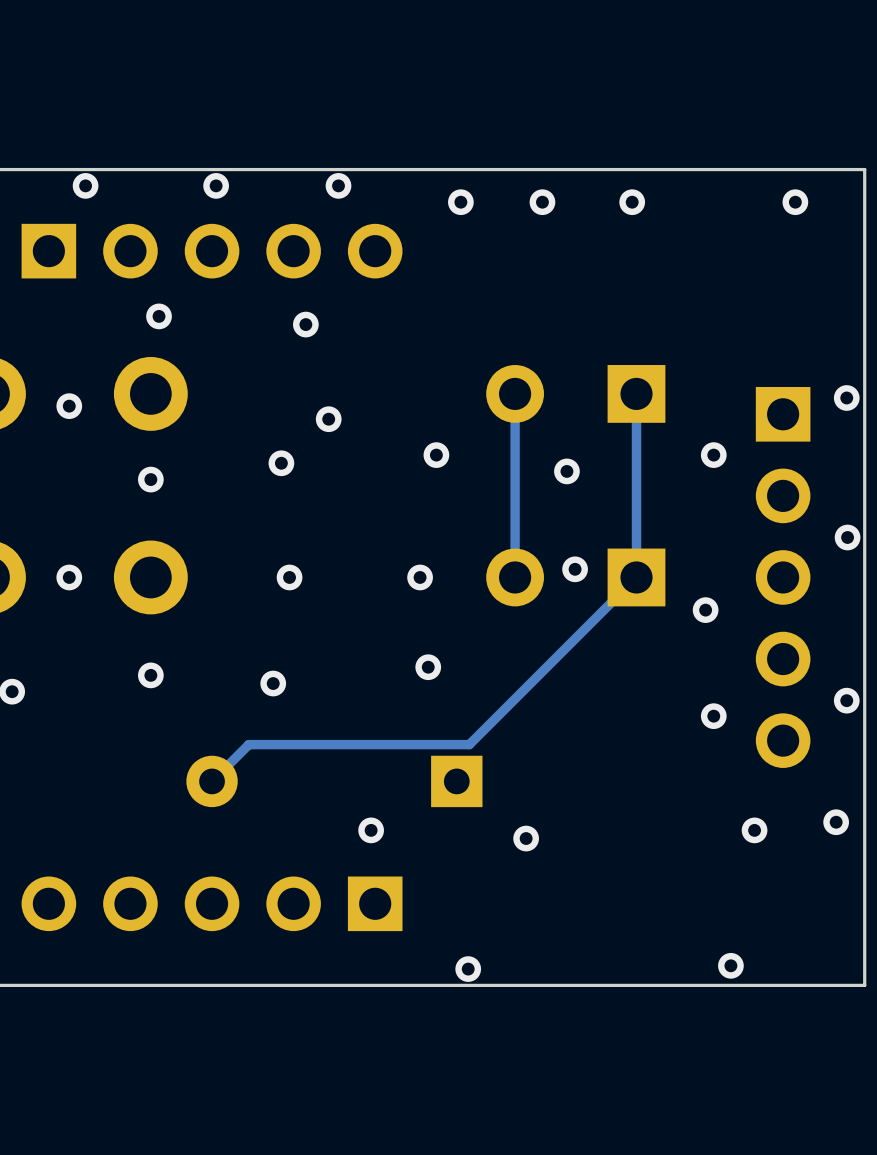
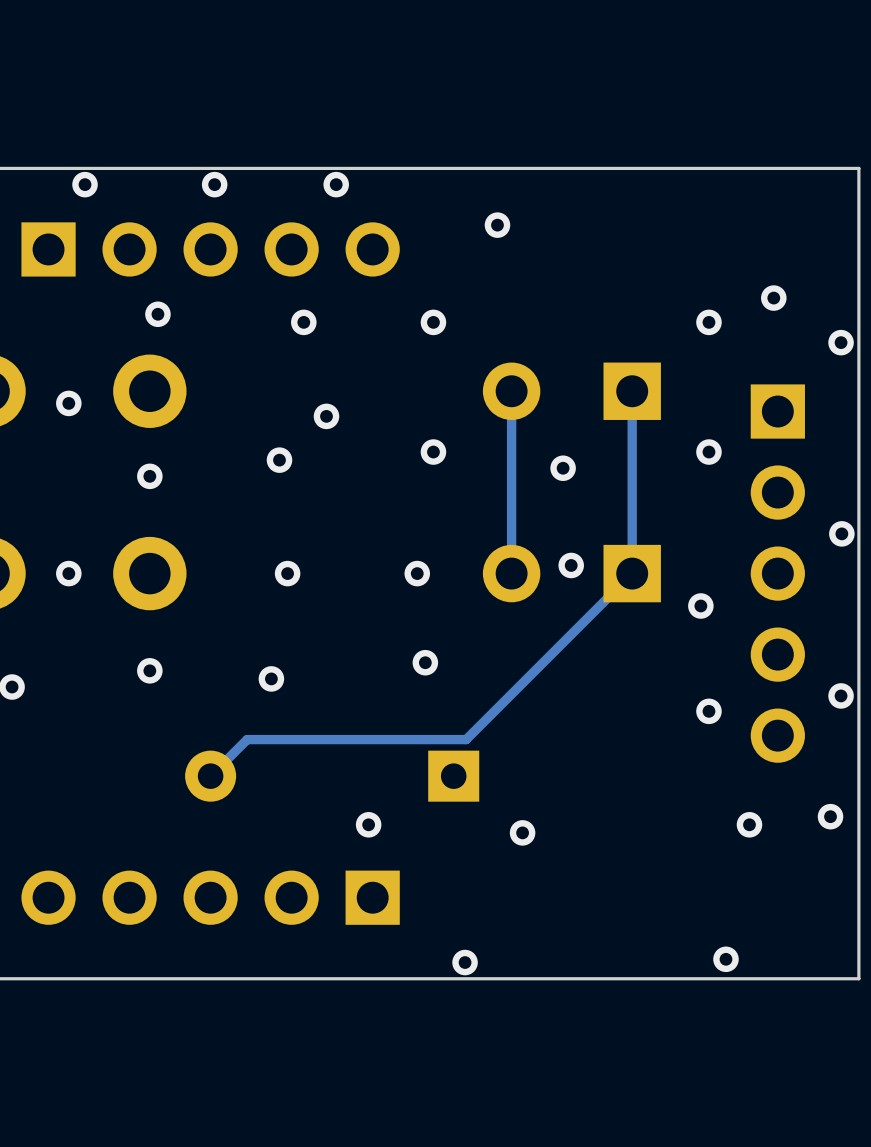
via: (460, 202) -> none
via: (542, 202) -> none
via: (632, 202) -> none
via: (795, 202) -> none
via: none -> (497, 225)
via: none -> (773, 298)
via: none -> (433, 322)
via: none -> (708, 322)
via position: (846, 397) -> (841, 342)

